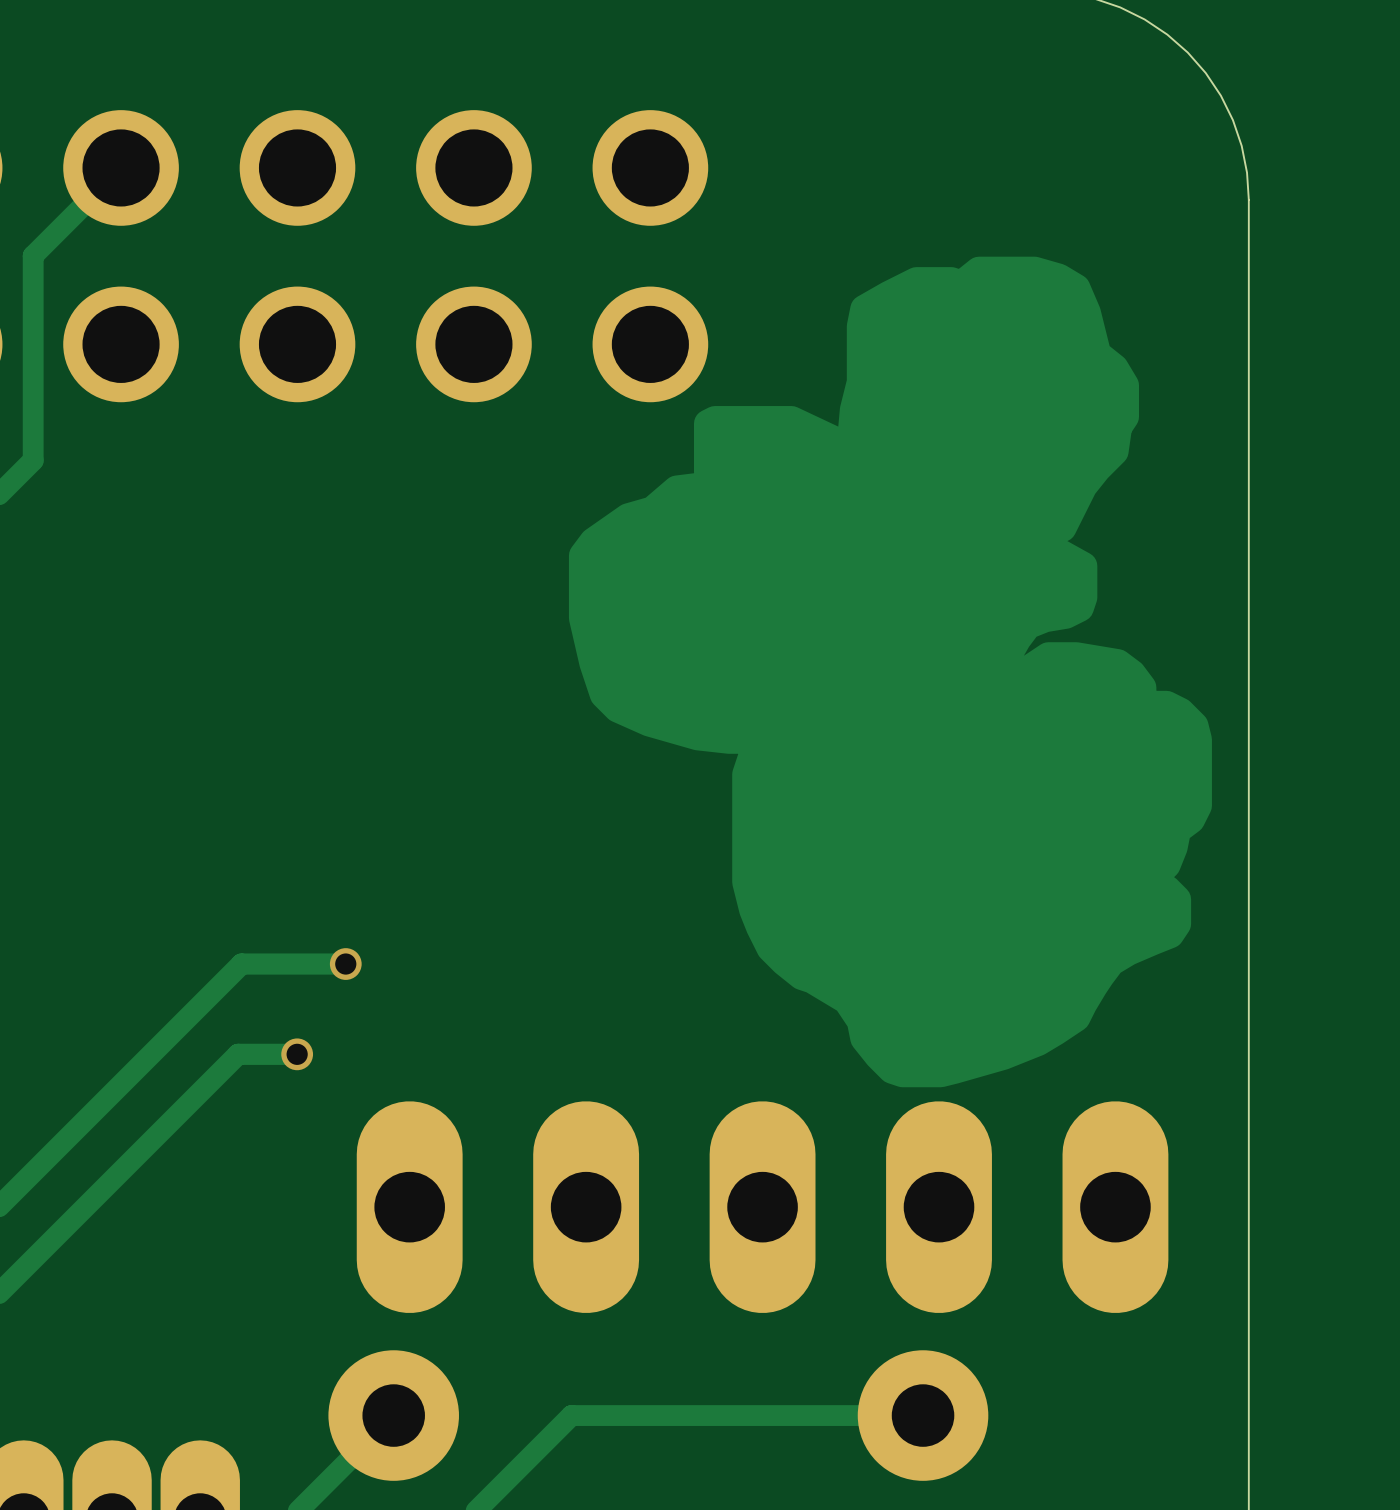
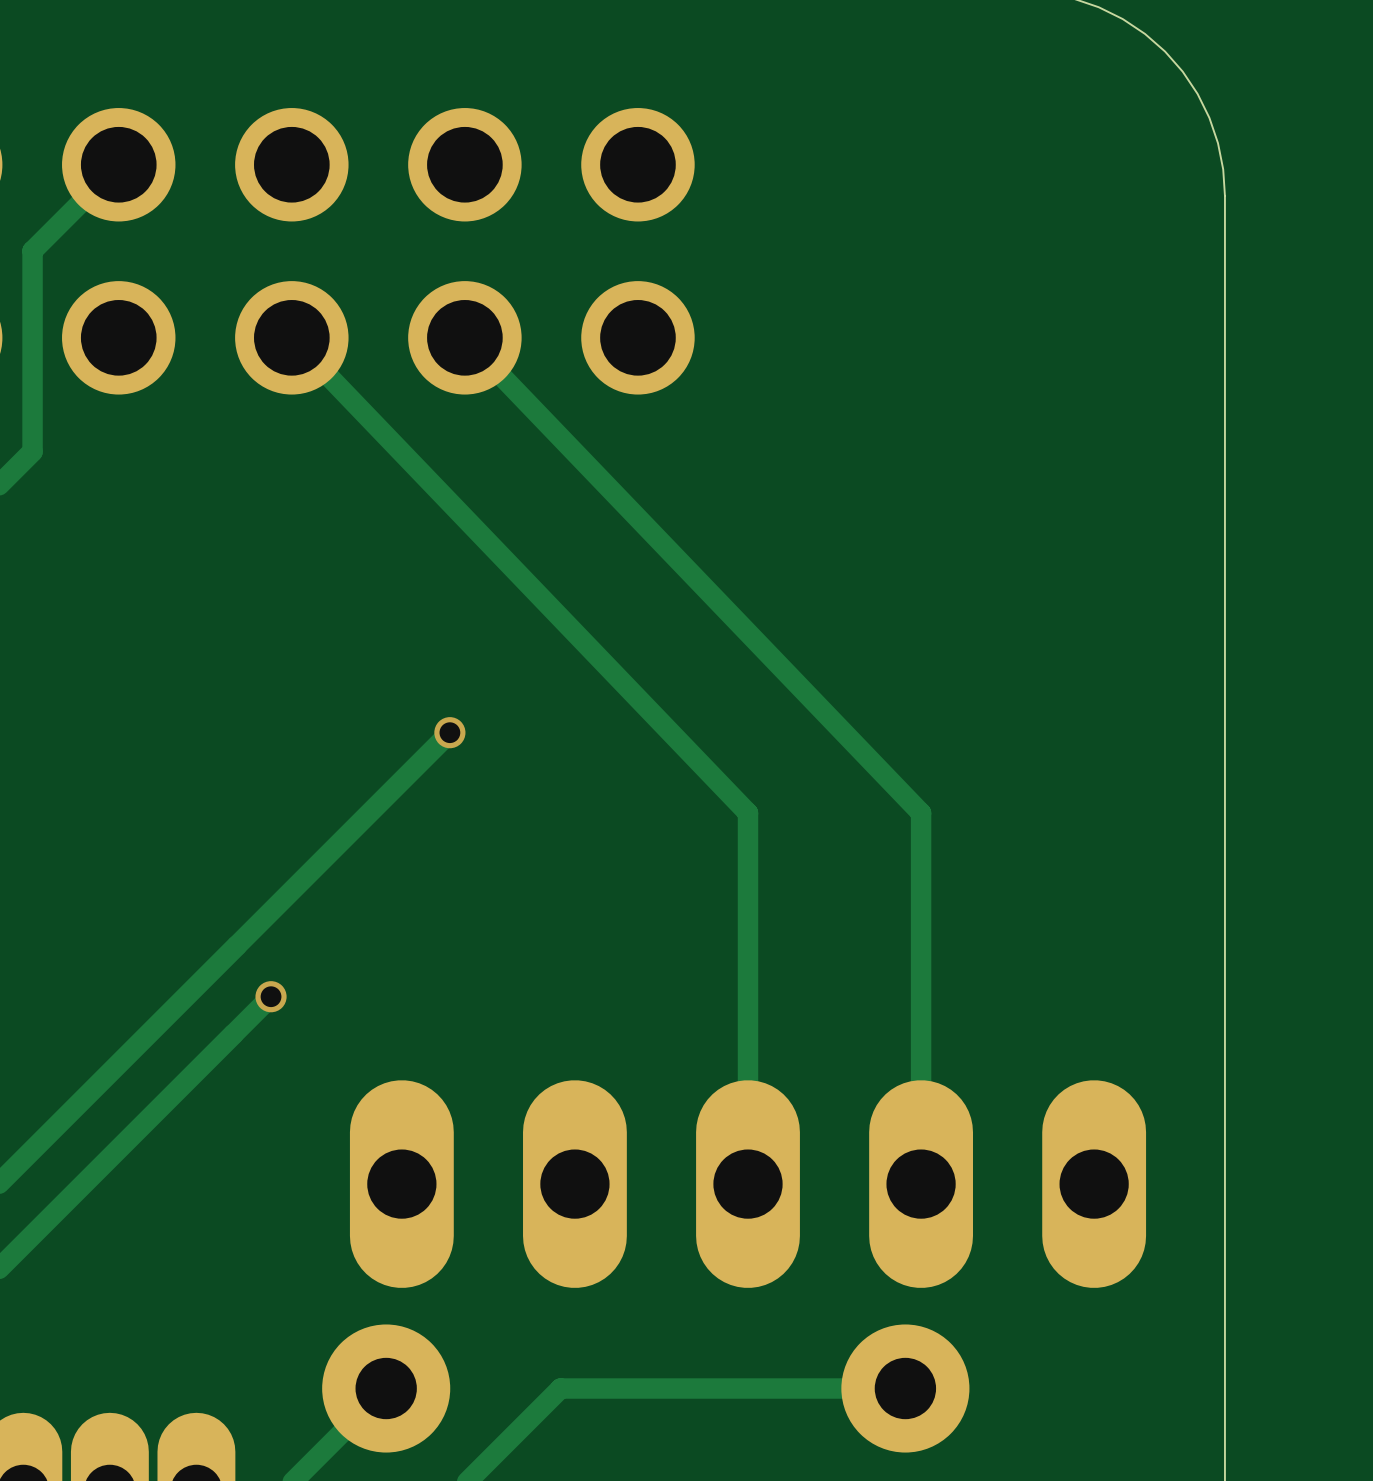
drawing: [568, 256, 1212, 1088] -> none
track: none -> (291, 337) (748, 813) (748, 1184)
track: none -> (464, 337) (921, 813) (921, 1184)
via: none -> (449, 732)
track: (345, 964) (241, 964) -> (449, 732) (236, 945)
via: (345, 964) -> none
via: none -> (271, 996)
track: (297, 1054) (238, 1054) -> (271, 996) (233, 1034)
via: (297, 1054) -> none

